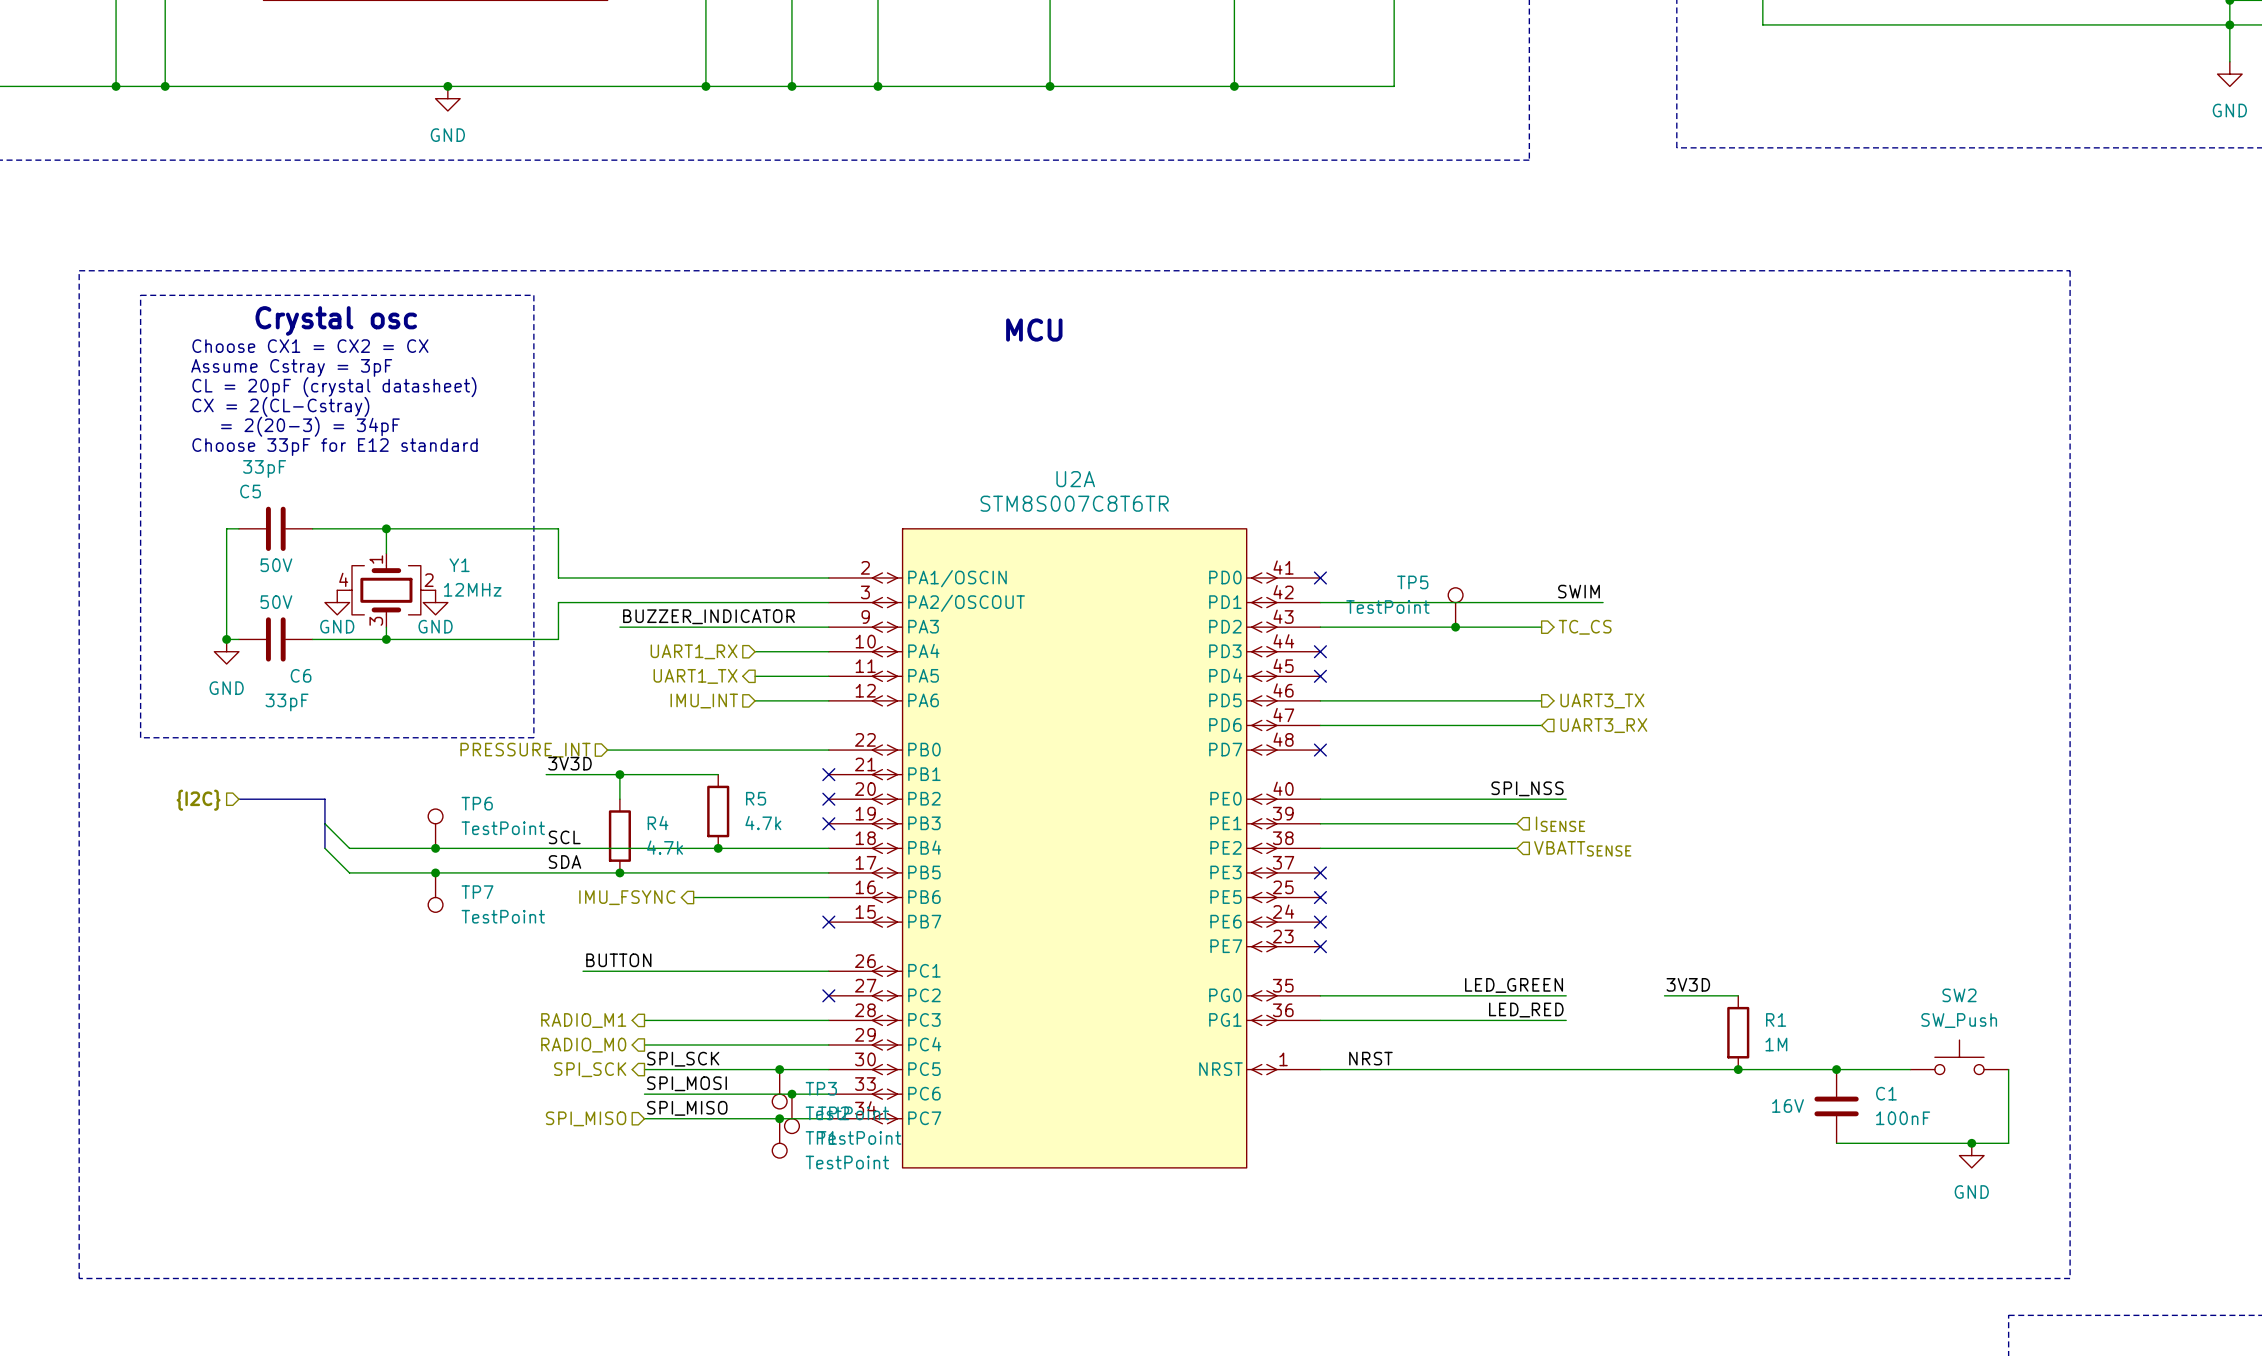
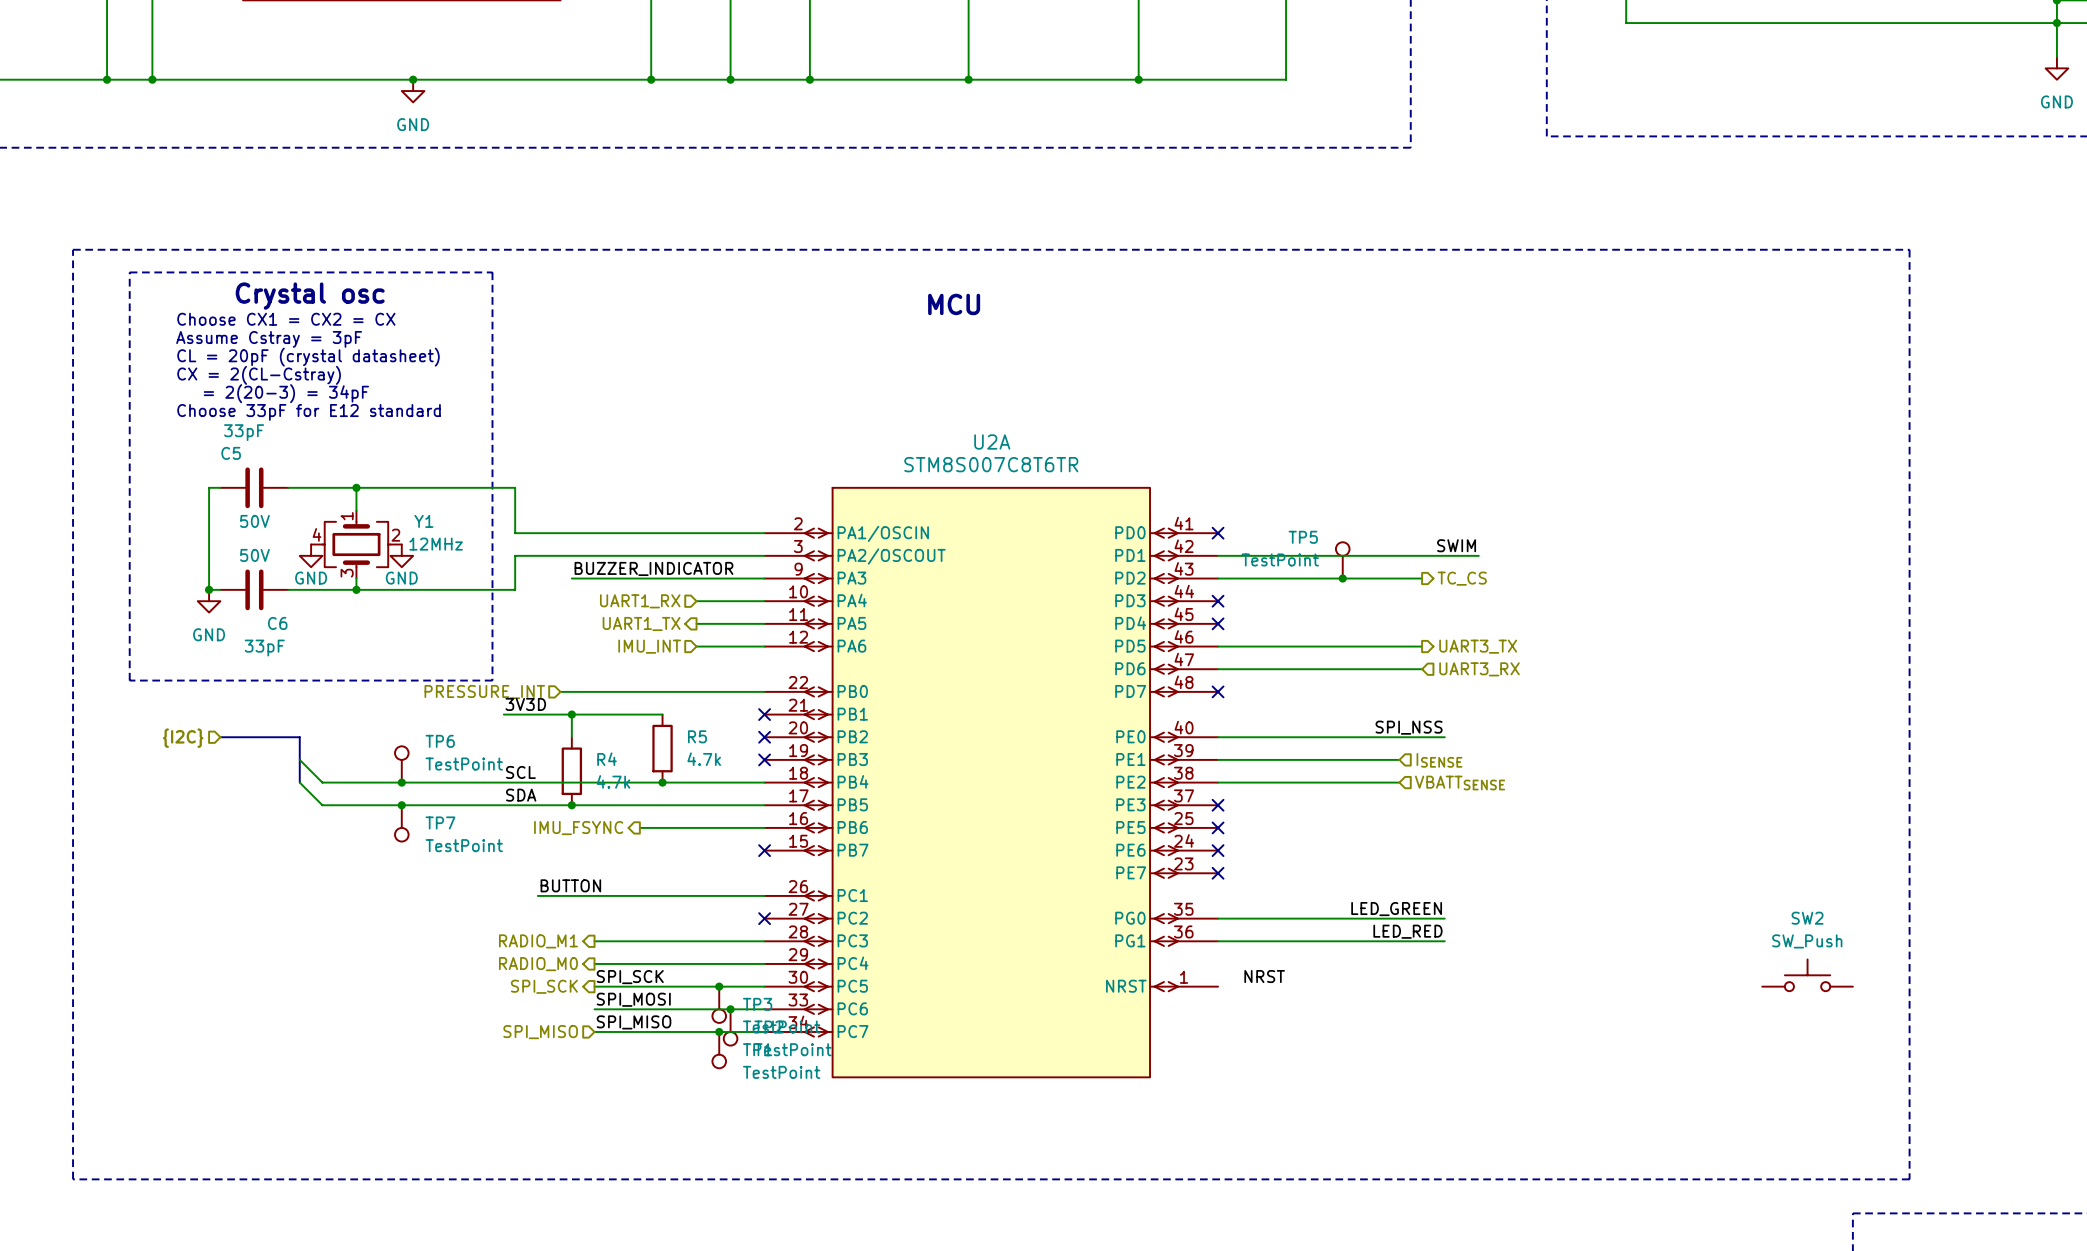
label: 3V3D (1688, 984) -> none
wire: (1664, 995) (1738, 995) -> none
R1: 1M (1738, 1032) -> none
wire: (1320, 1069) (1910, 1069) -> none
junction: (1738, 1069) -> none
junction: (1836, 1069) -> none
wire: (2008, 1069) (2008, 1143) (1836, 1143) -> none
C1: 100nF (1836, 1106) -> none
junction: (1971, 1143) -> none
power symbol: GND (1971, 1155) -> none

